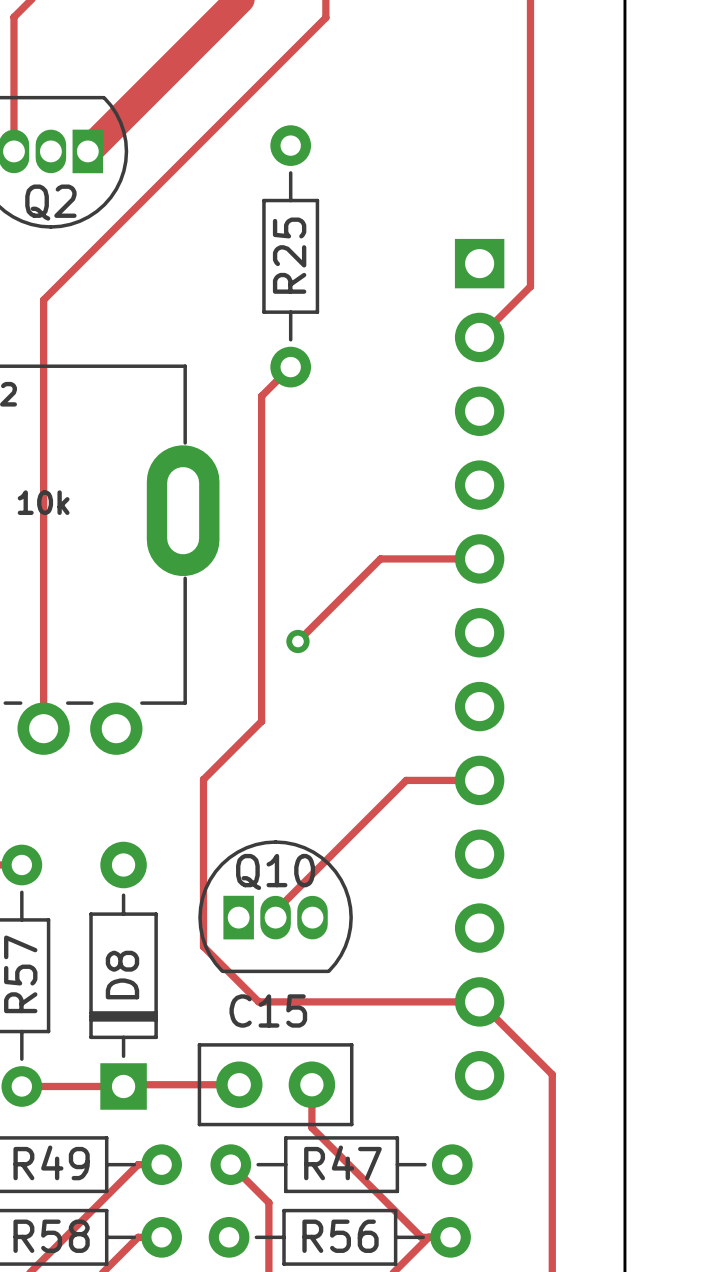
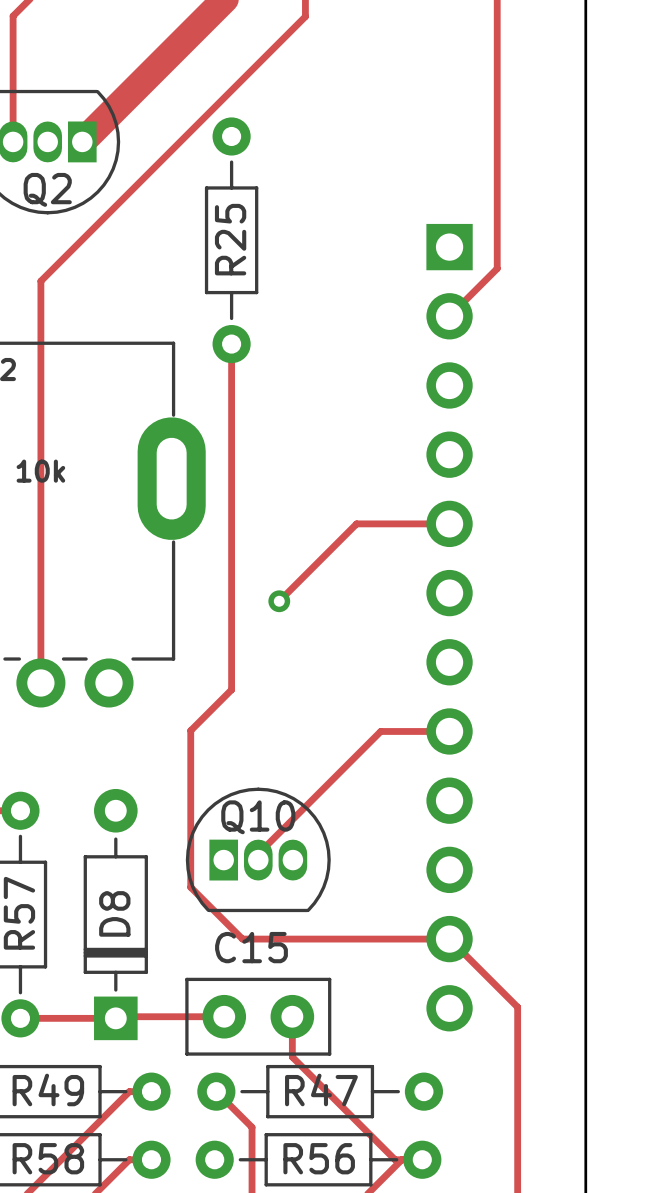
R25 position: (290, 256) -> (231, 240)
track: (290, 367) (261, 396) (261, 721) (247, 735) -> (231, 344) (231, 689)

